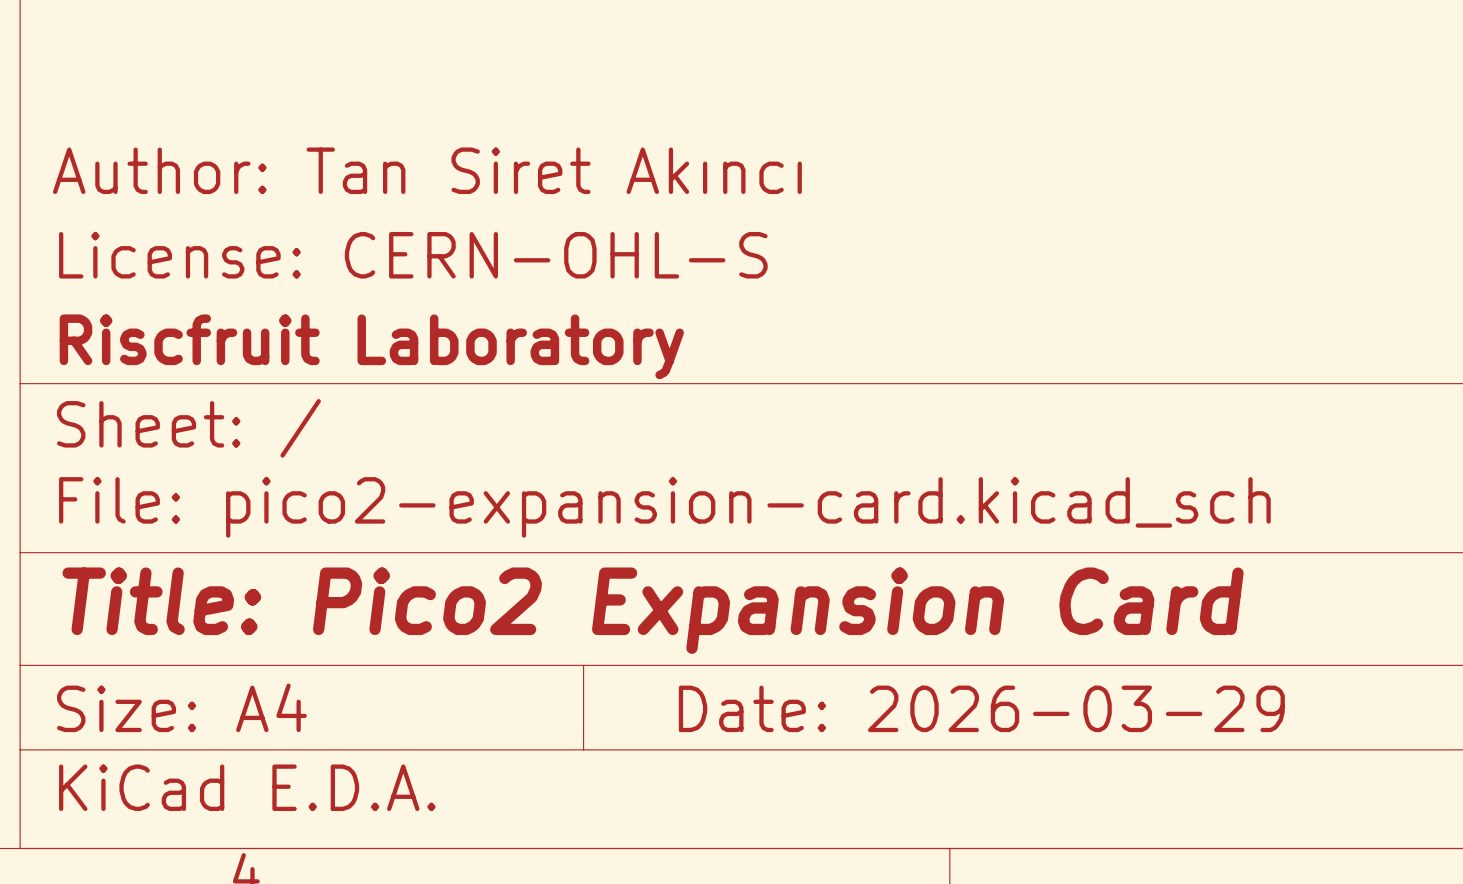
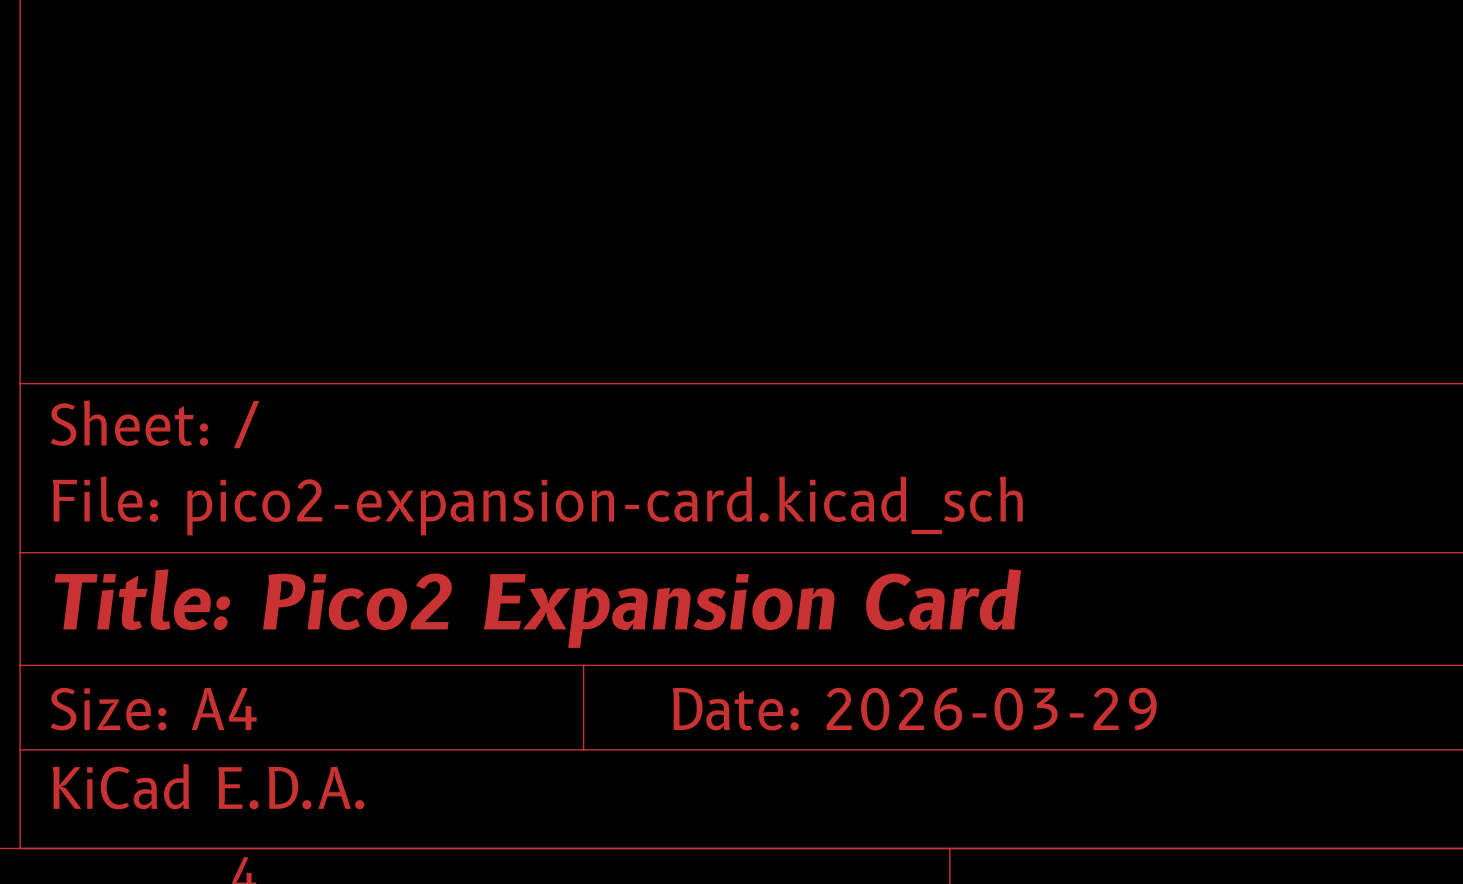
title block: Author: Tan Siret Akıncı (427, 170) -> none
title block: License: CERN-OHL-S (413, 255) -> none
title block: Riscfruit Laboratory (371, 346) -> none

